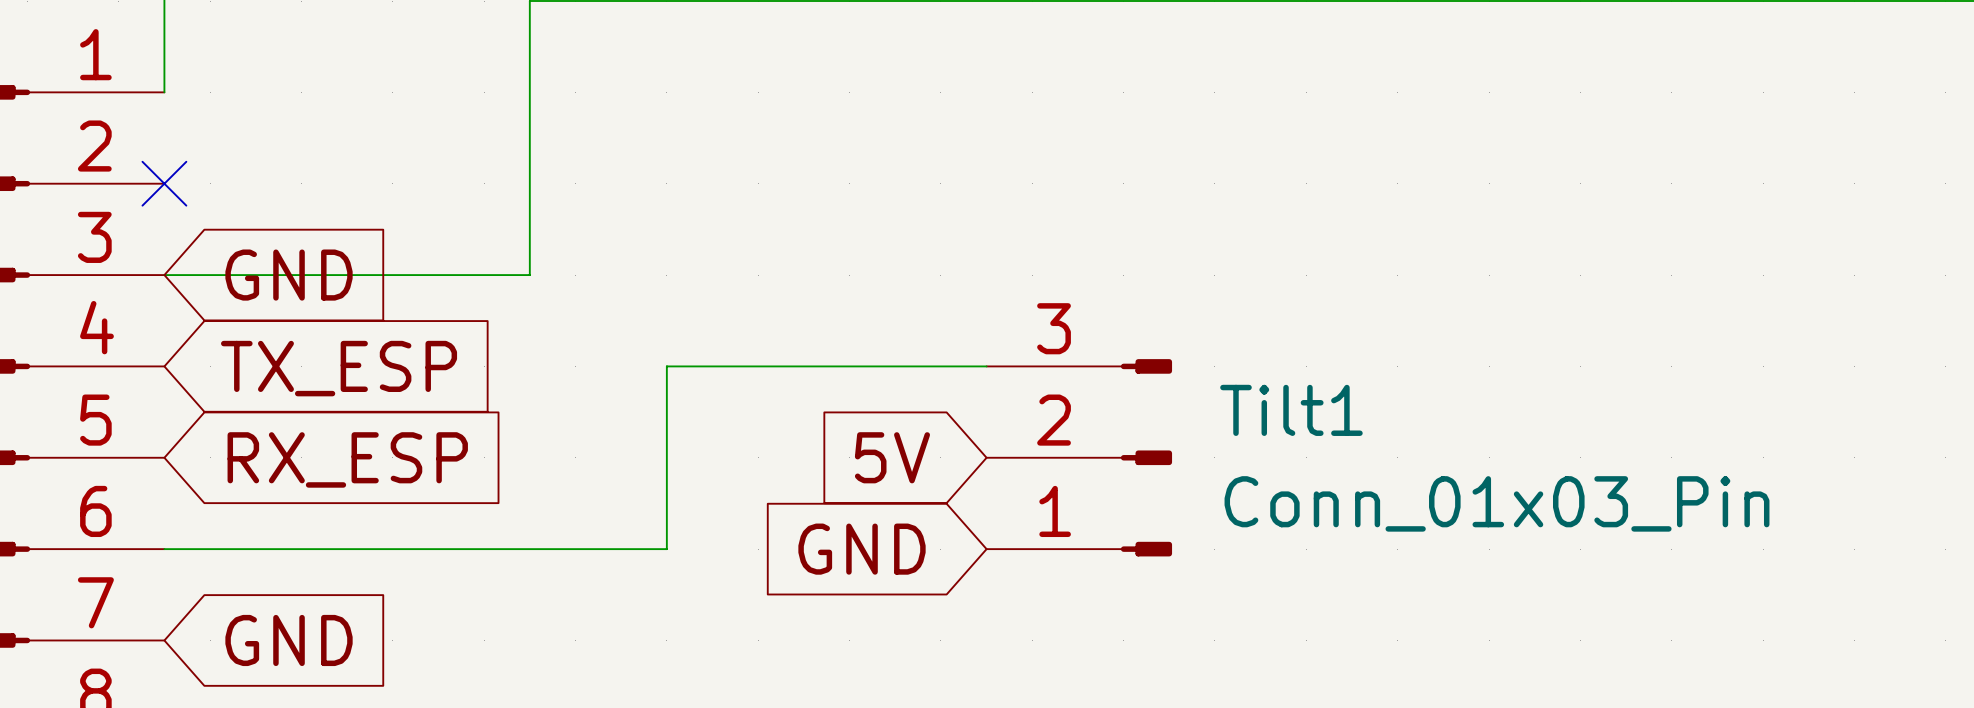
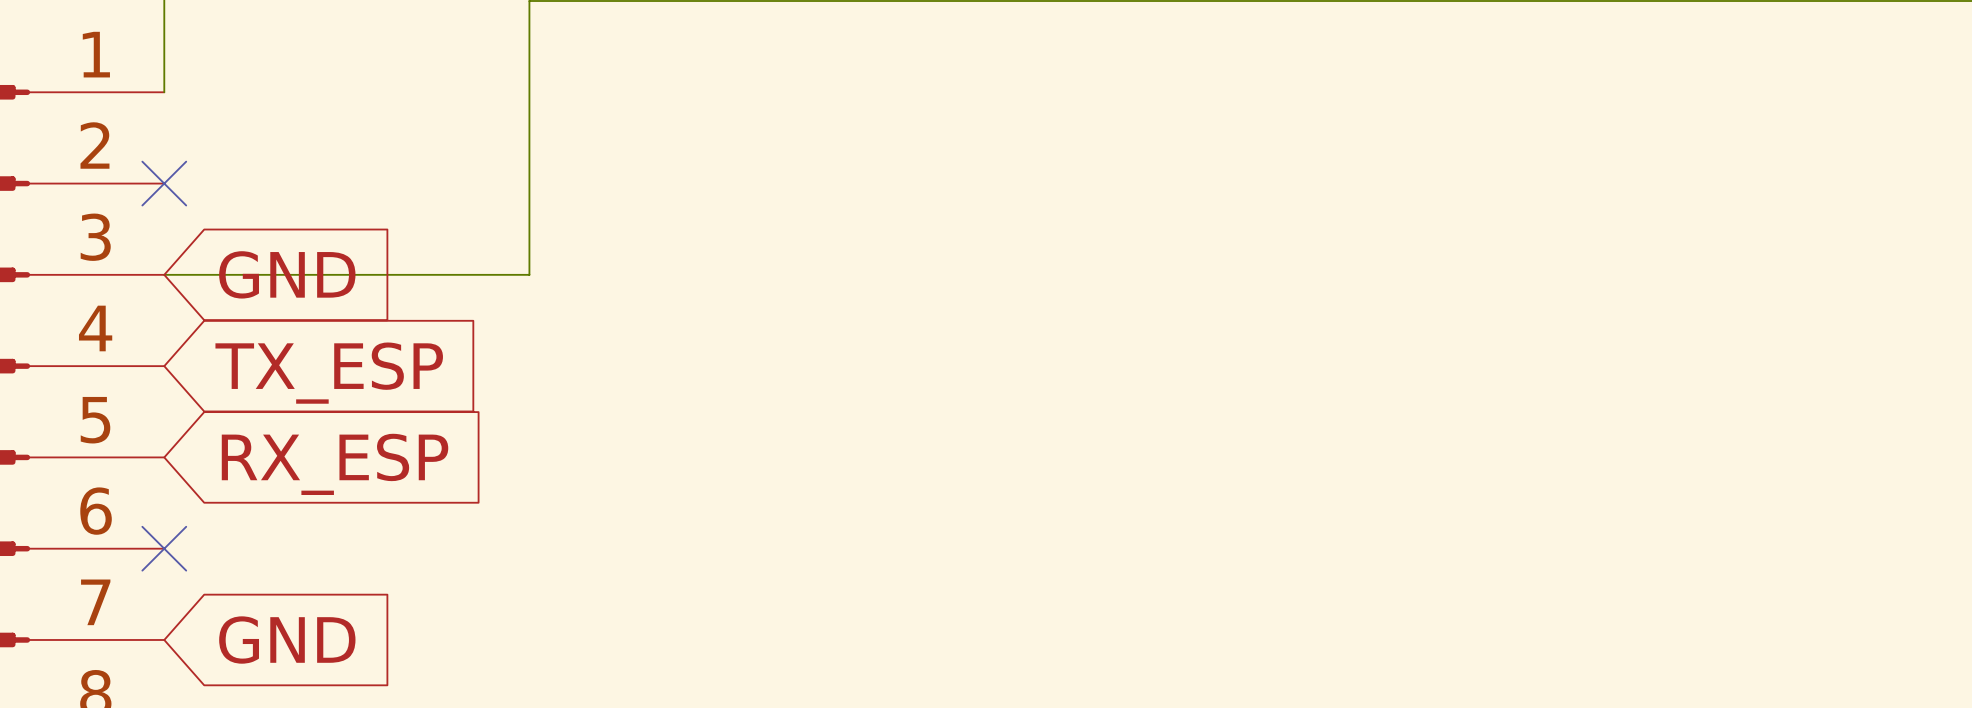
wire: (986, 366) (666, 366) (666, 549) (164, 549) -> none
global label: 5V (892, 457) -> none
Tilt1: Conn_01x03_Pin (1079, 457) -> none
no-connect mark: none -> (164, 548)
global label: GND (862, 549) -> none

